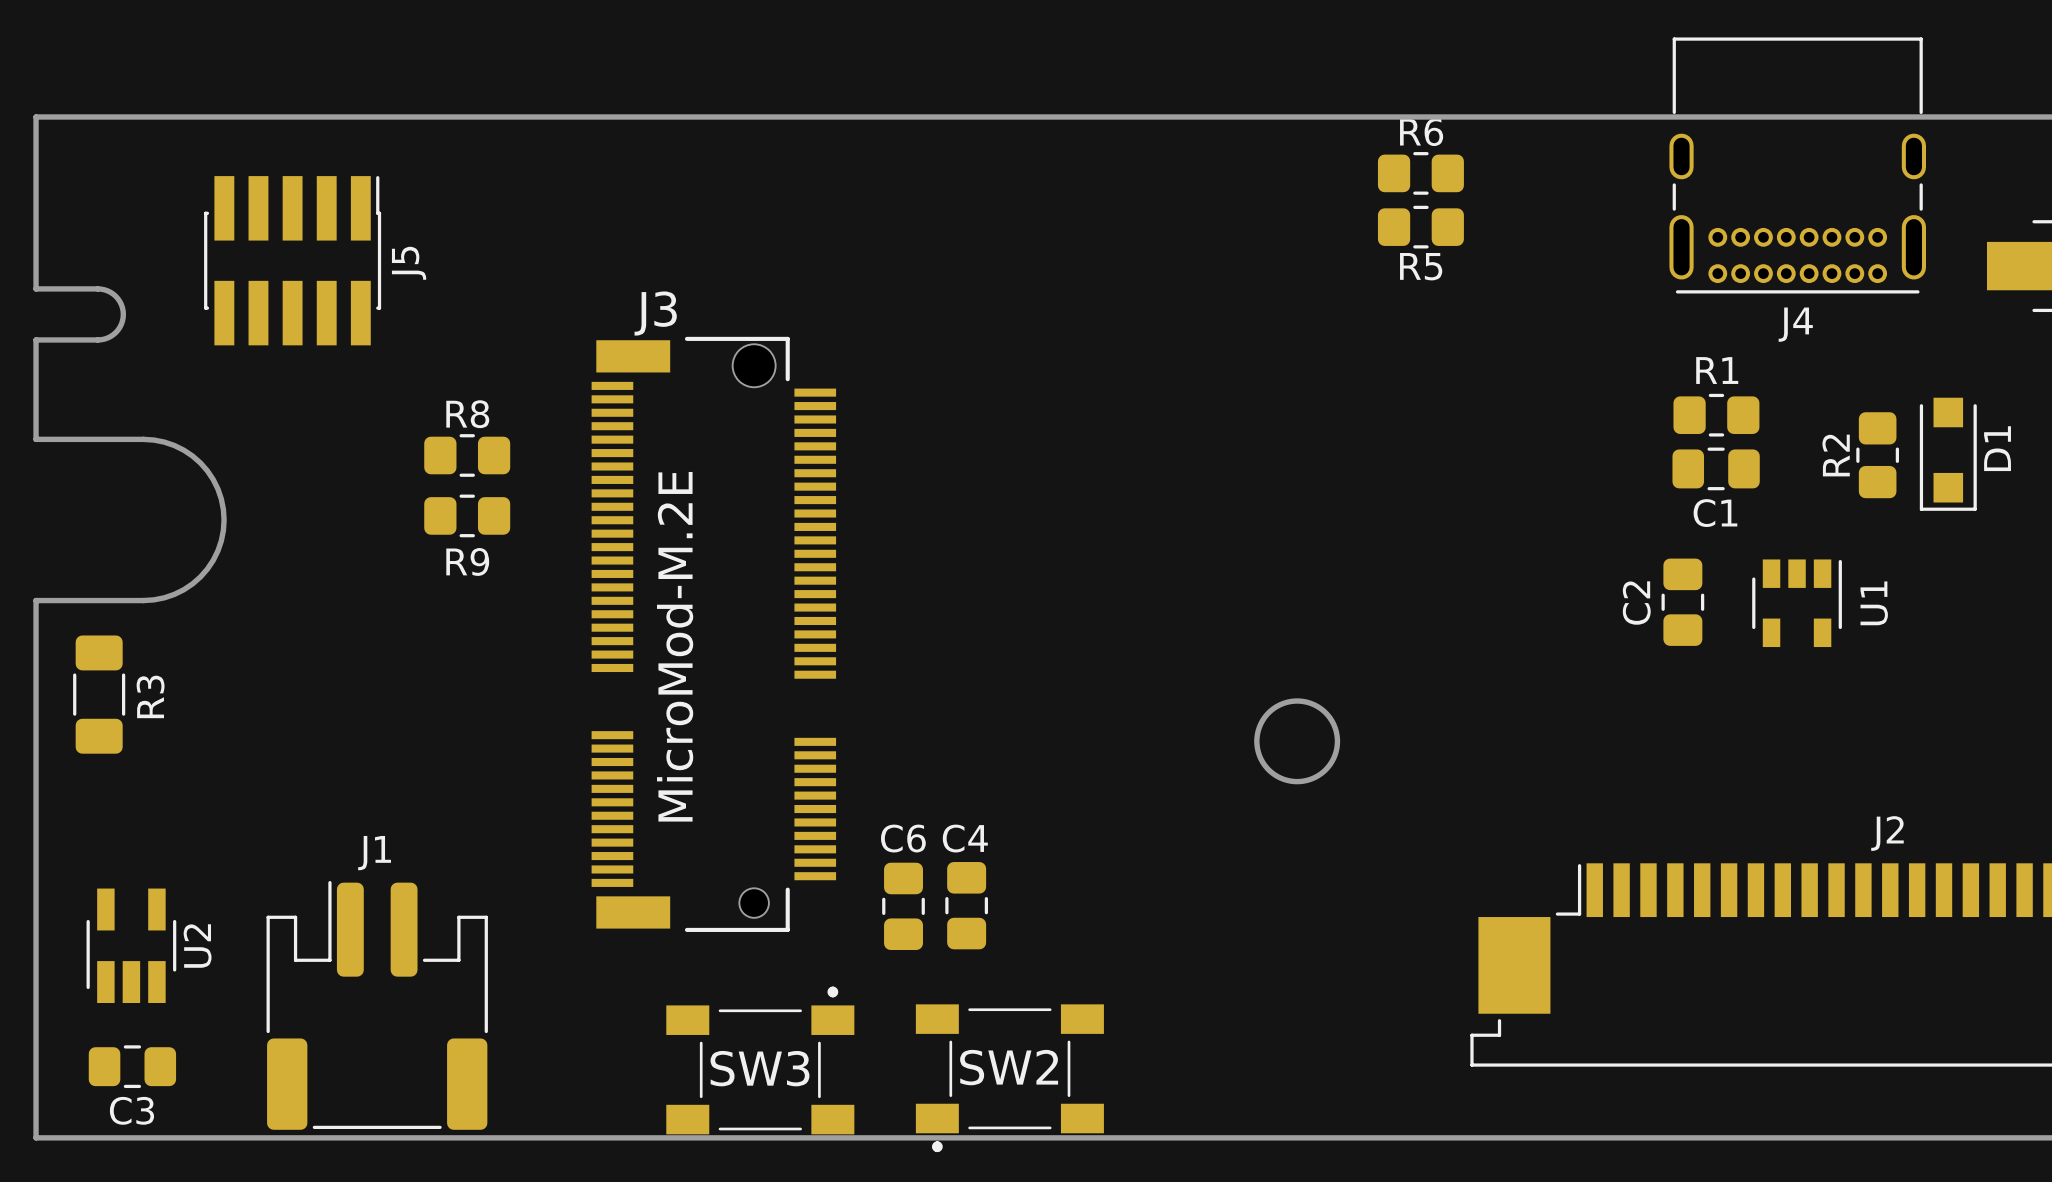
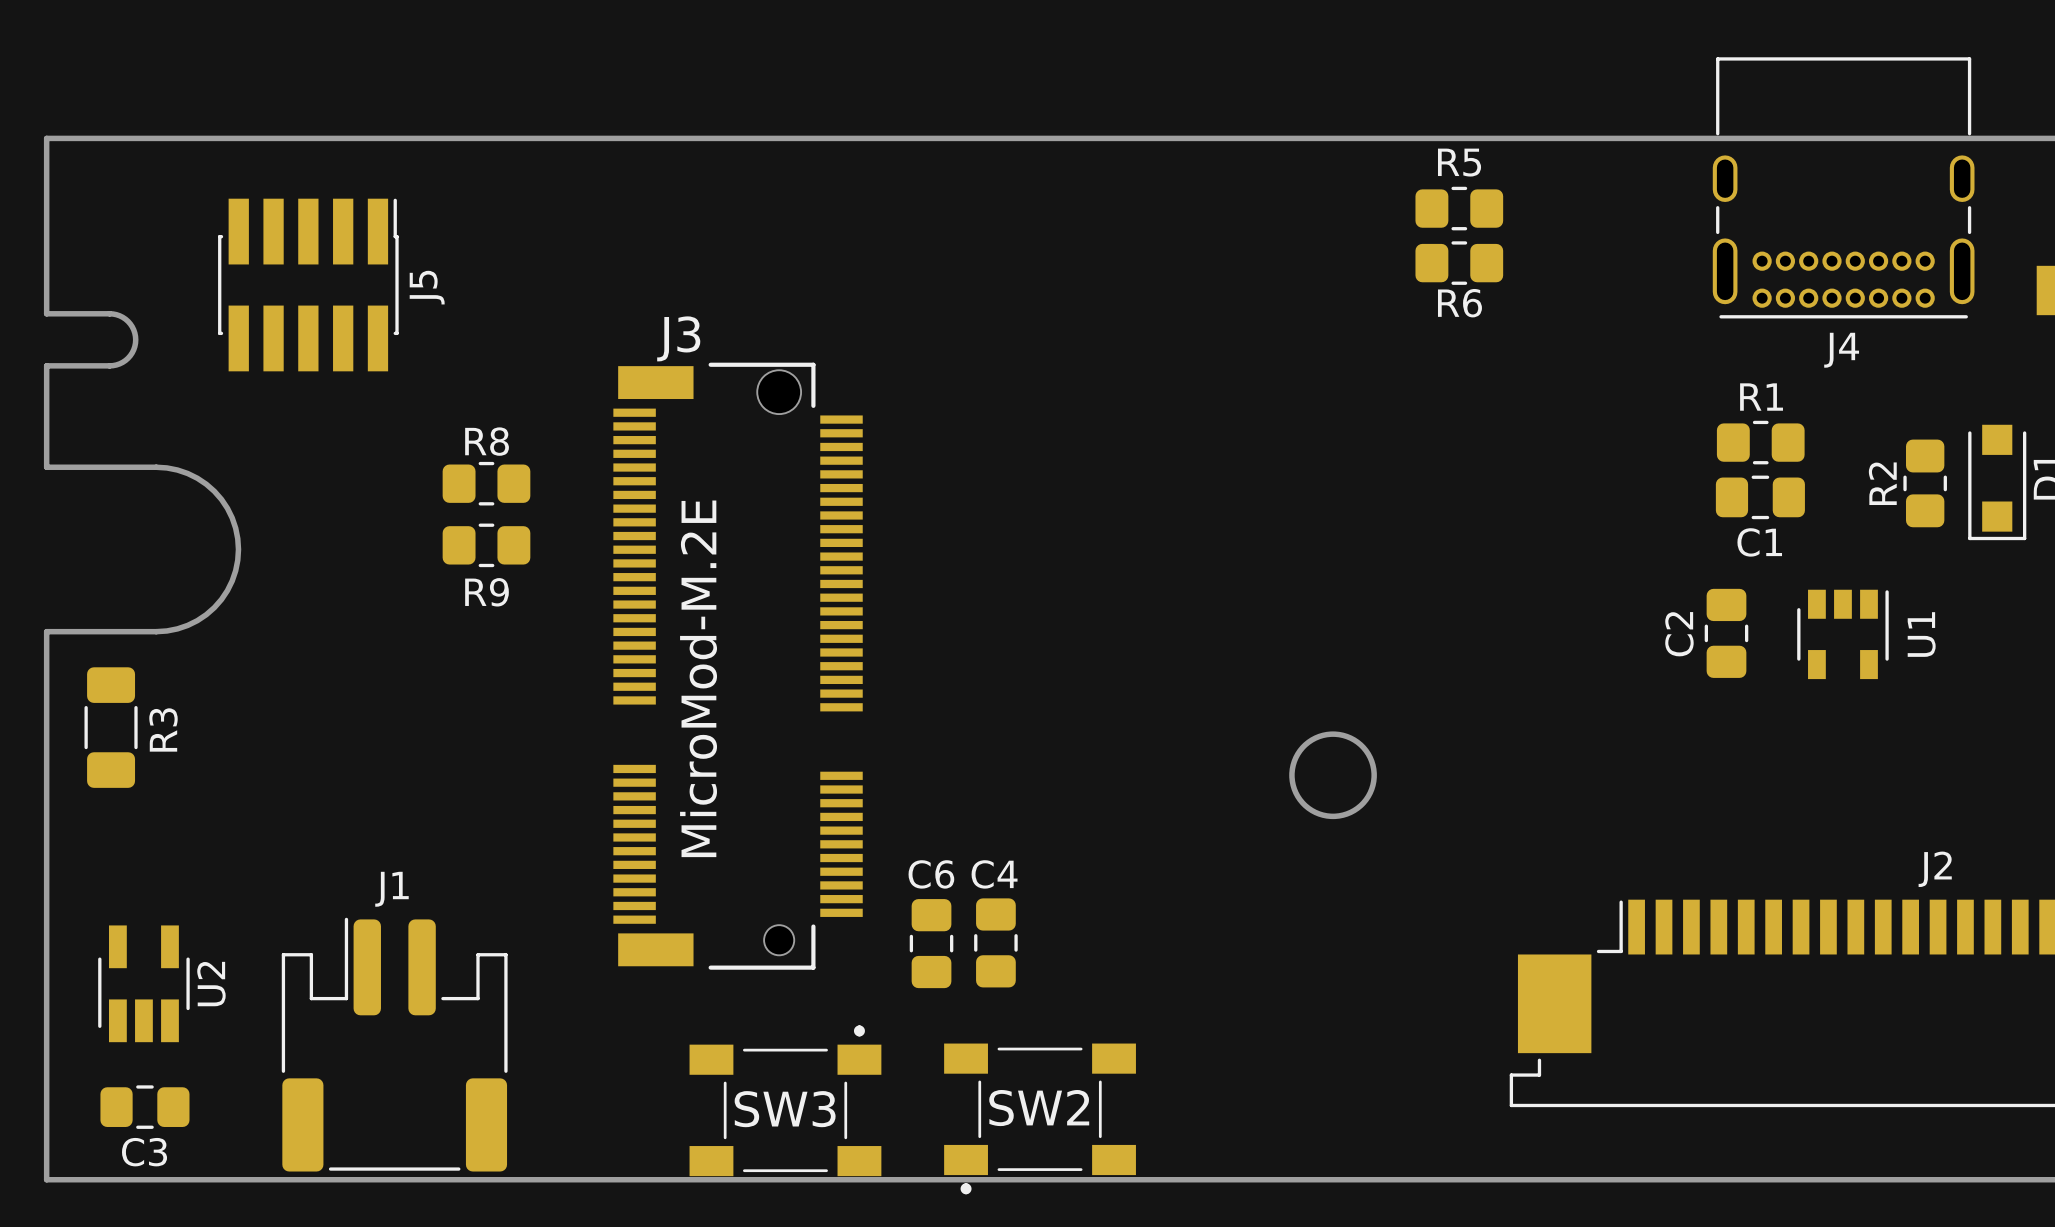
R6 name position: R6 (1421, 132) -> R6 (1459, 303)
R6 position: (1420, 173) -> (1459, 263)
R5 position: (1420, 227) -> (1459, 208)
R5 name position: R5 (1421, 266) -> R5 (1459, 162)

